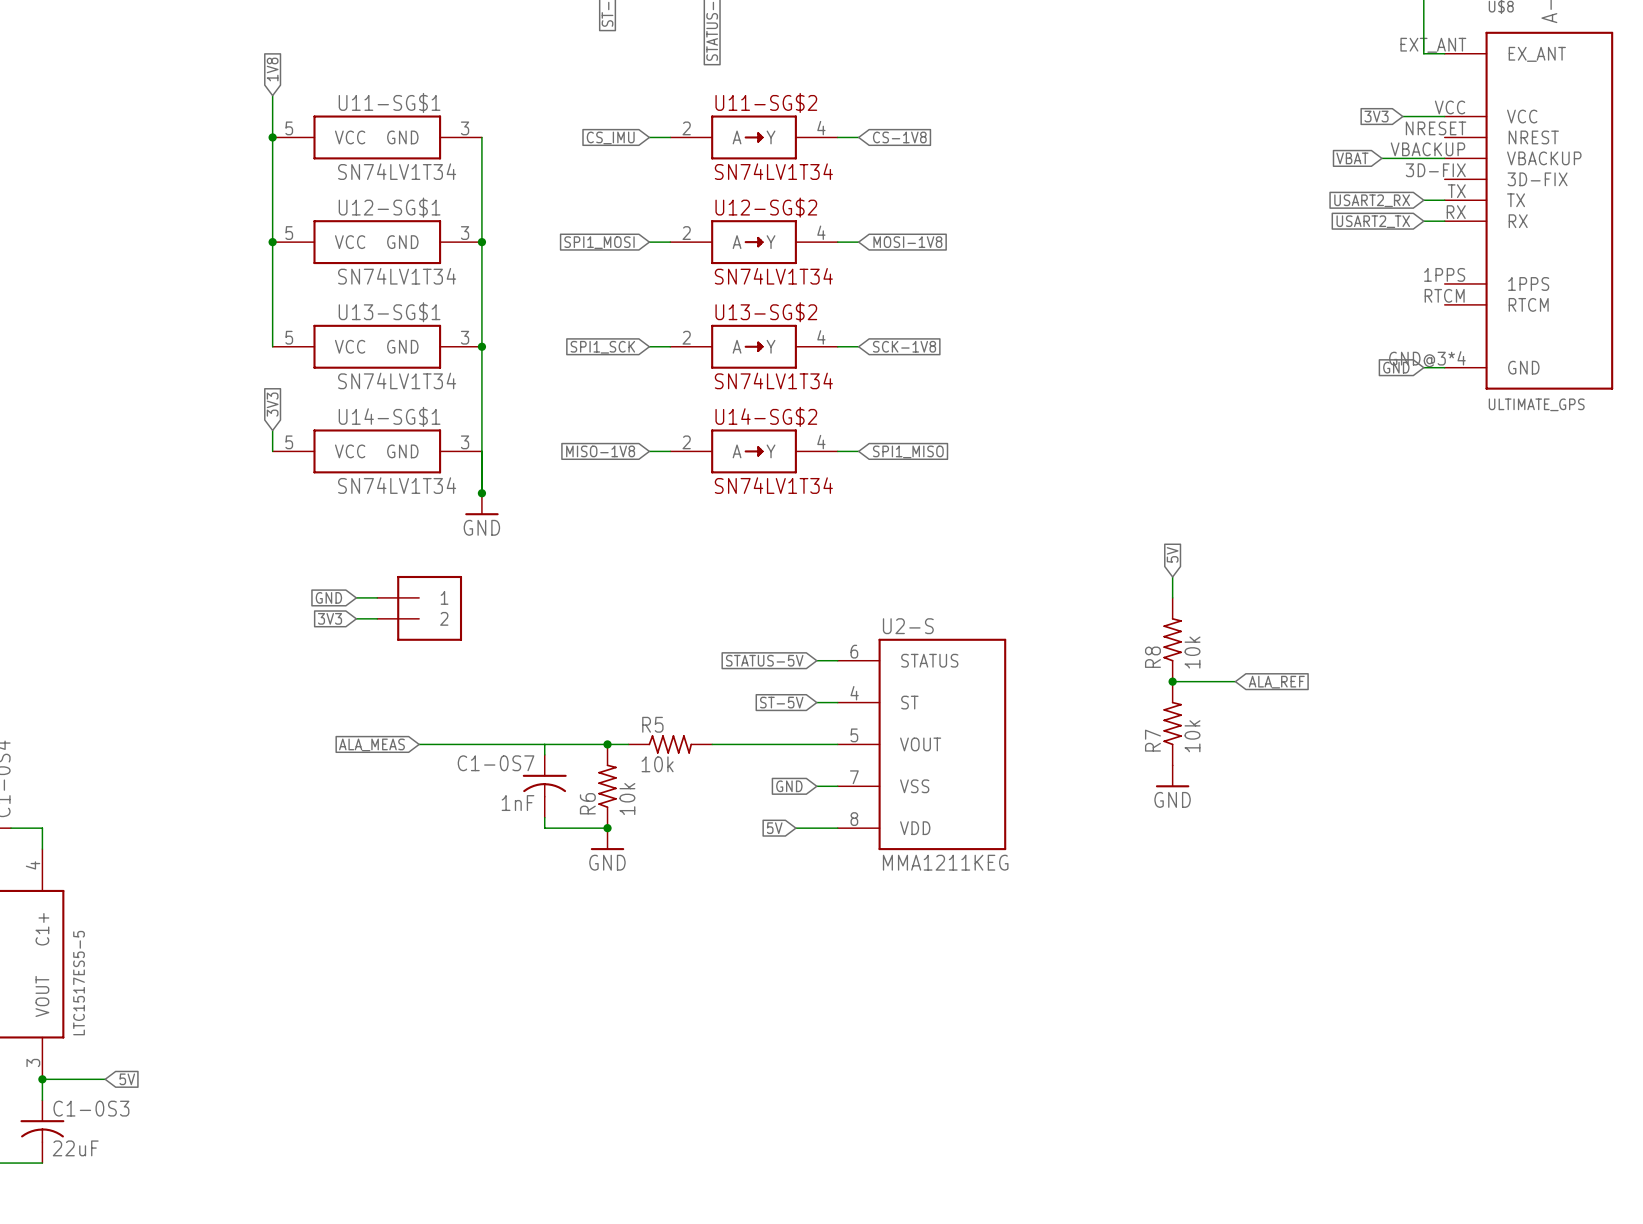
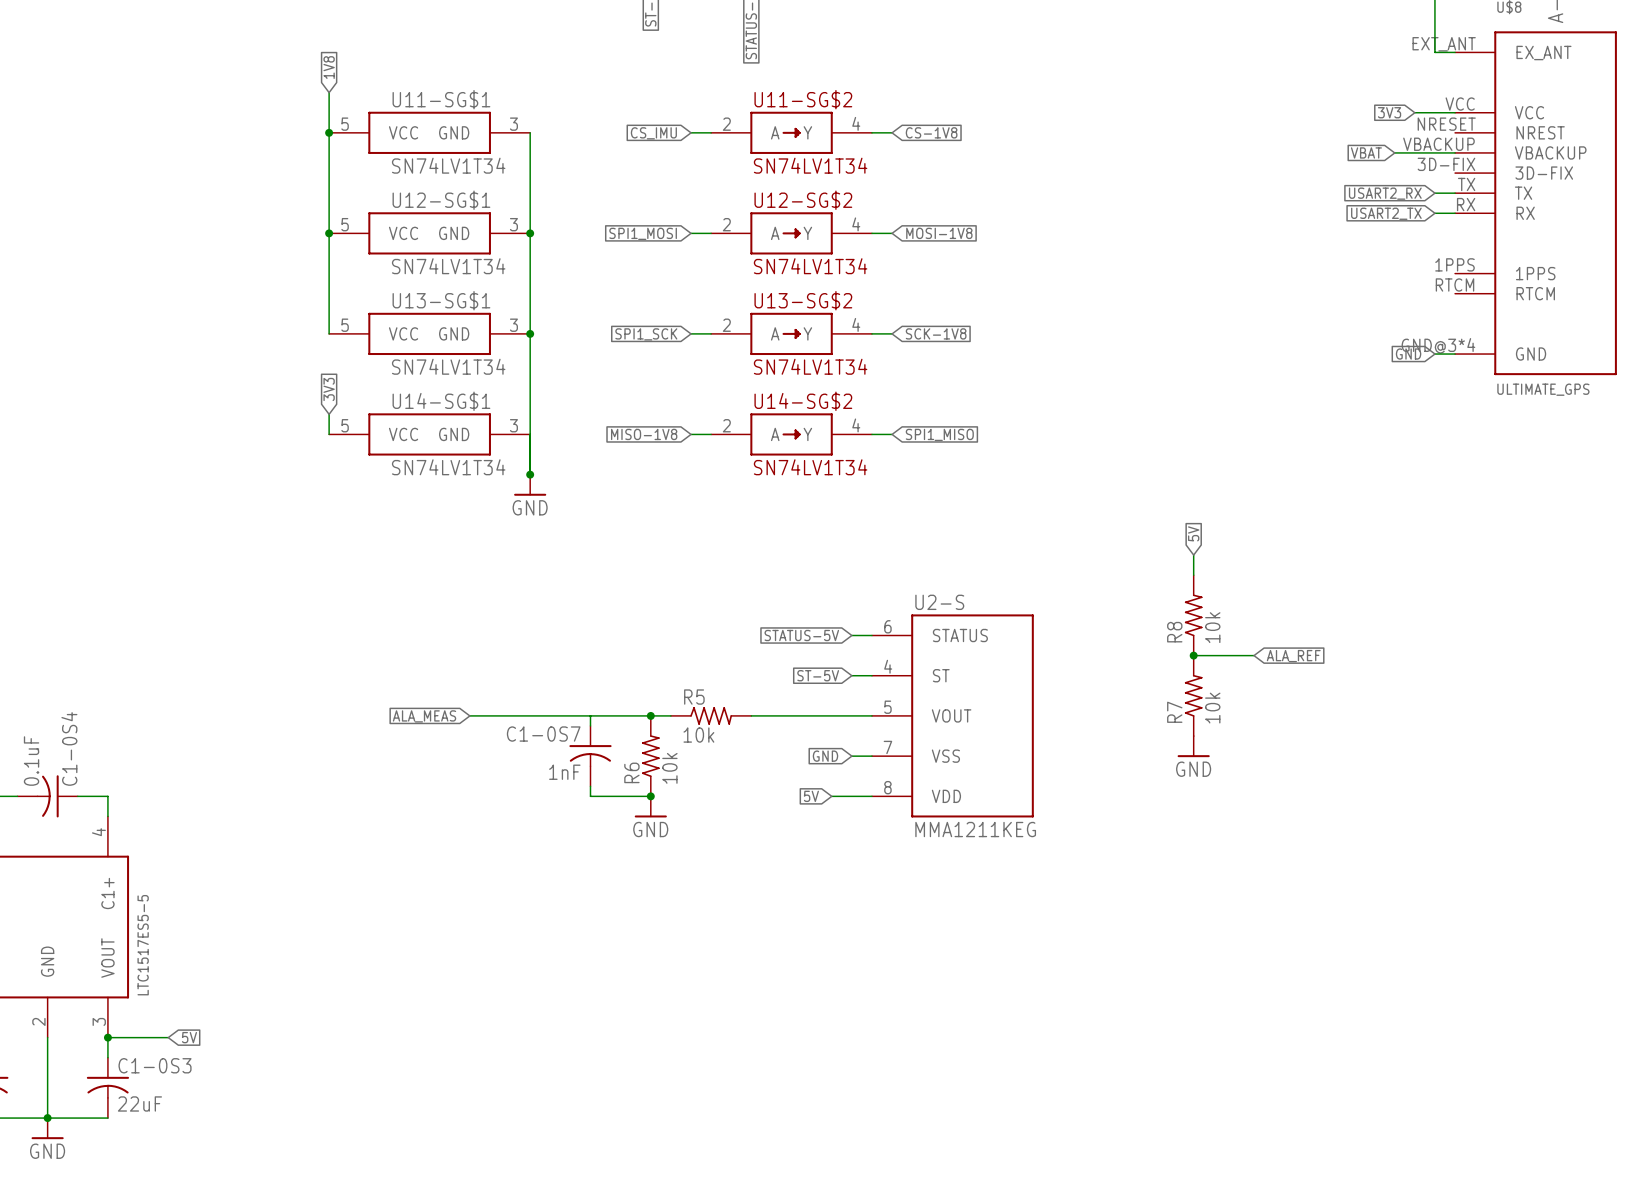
global label: GND (328, 597) -> none
wire: (356, 597) (377, 597) -> none
part: (419, 608) -> none
global label: 3V3 (330, 618) -> none
wire: (356, 618) (377, 618) -> none

